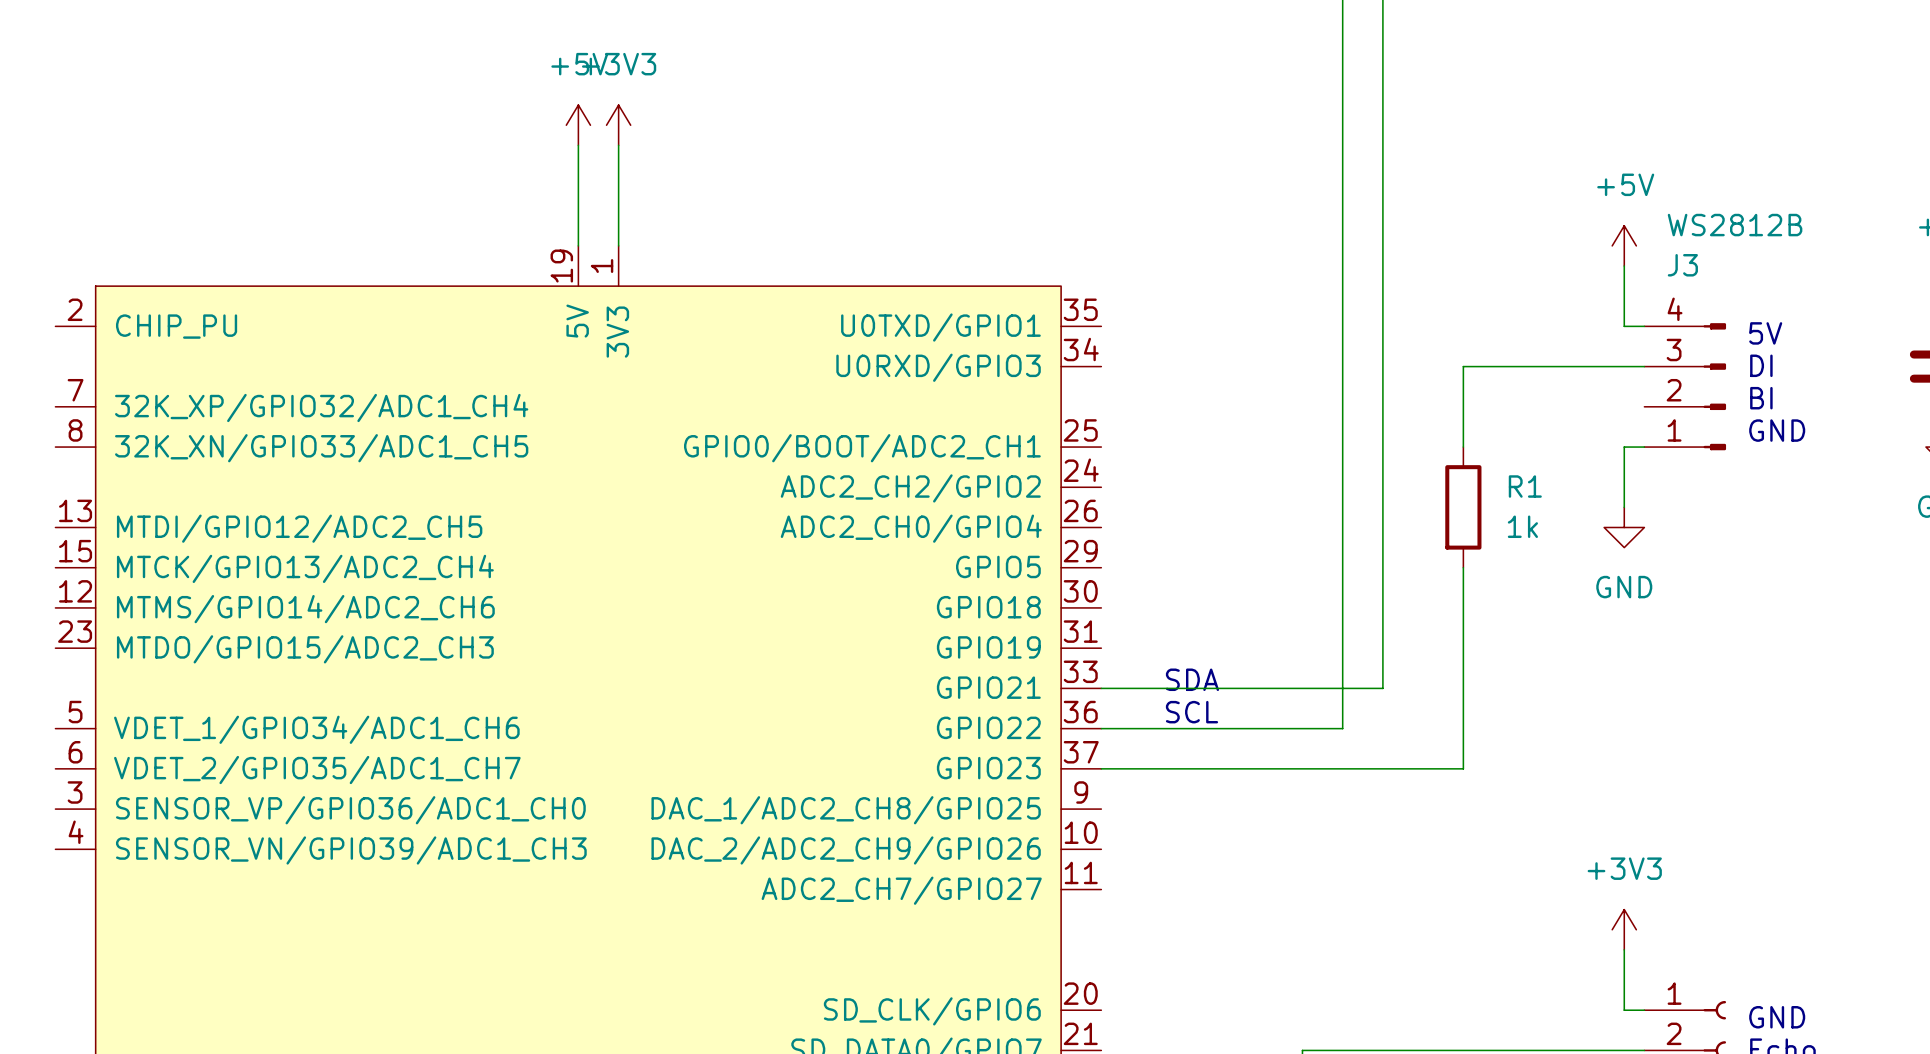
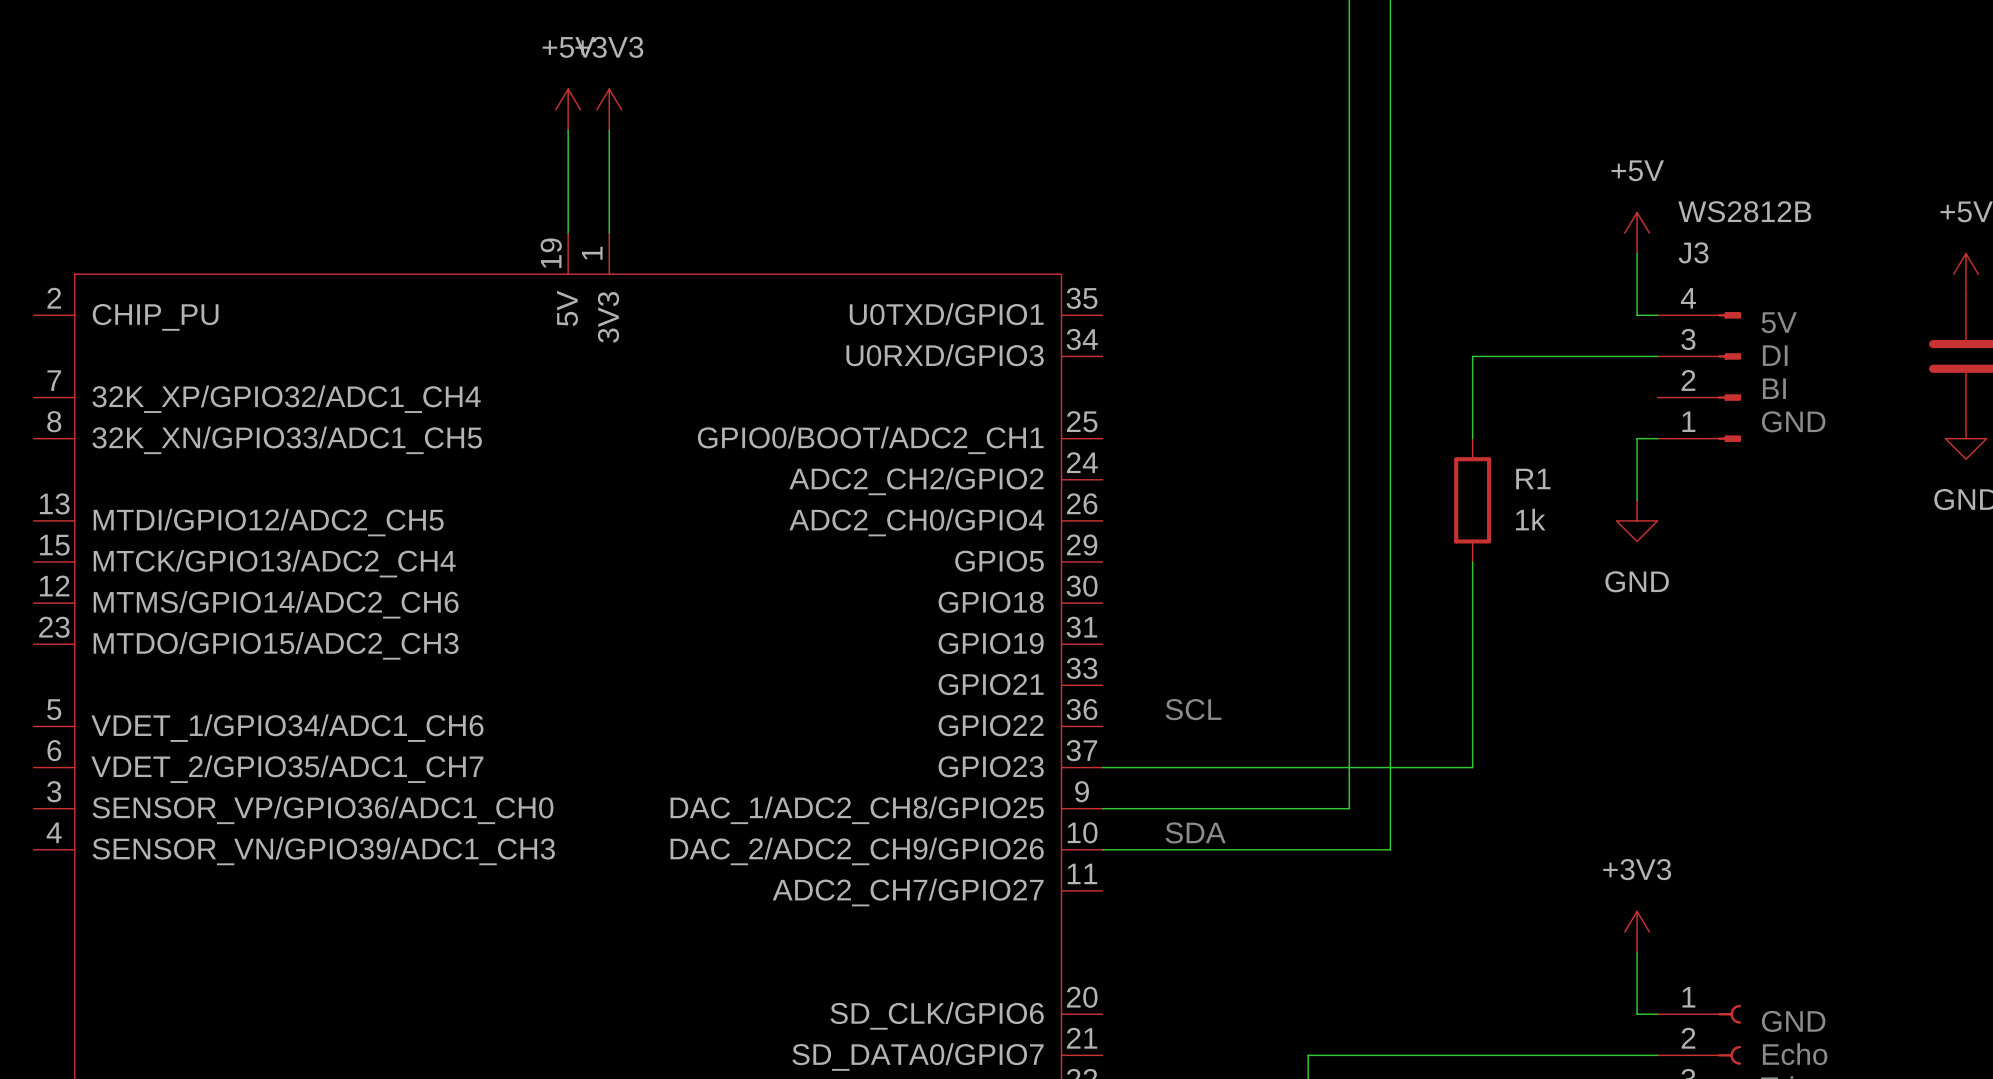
text position: SDA (1192, 679) -> SDA (1195, 832)
wire: (1101, 688) (1382, 688) -> (1102, 849) (1390, 849) (1390, 685)
wire: (1101, 728) (1342, 728) -> (1102, 808) (1349, 808) (1349, 726)

